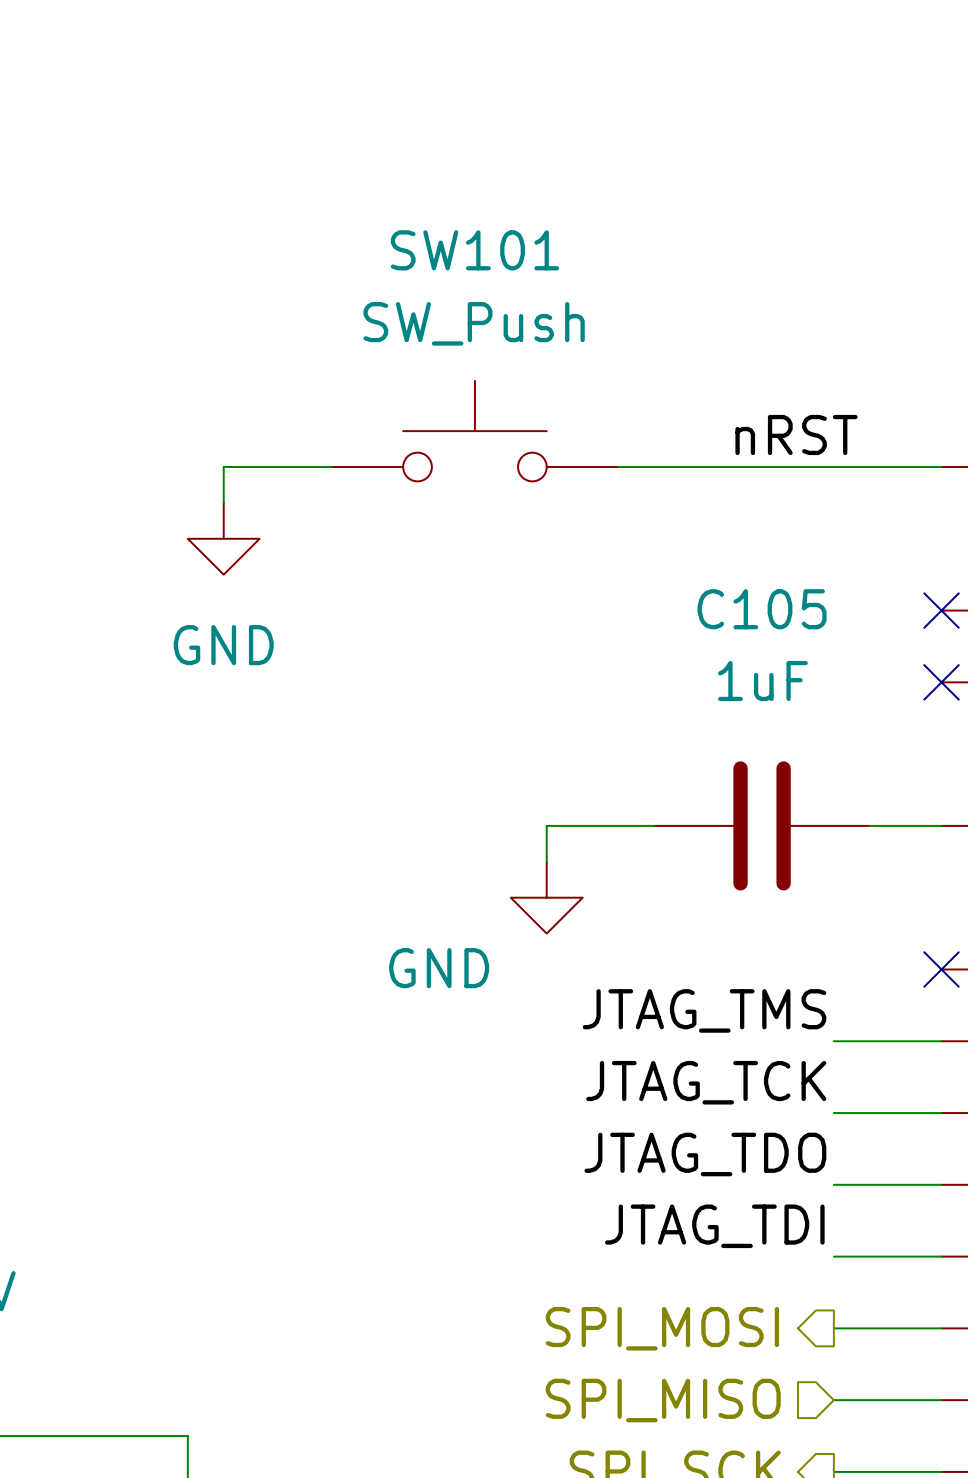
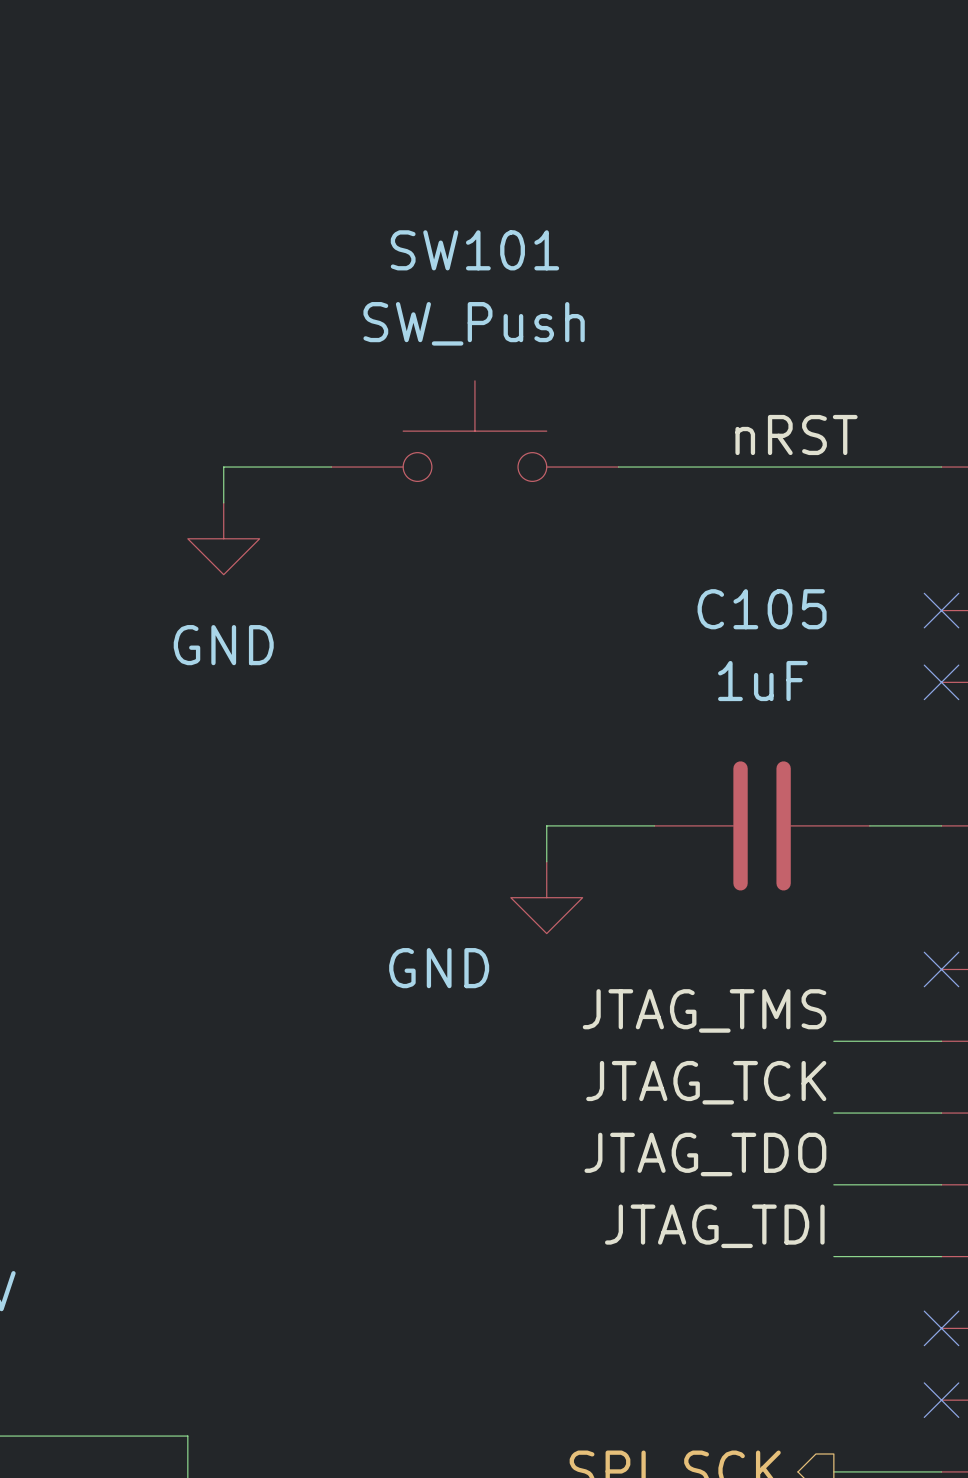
hierarchical label: SPI_MOSI (662, 1328) -> none
wire: (833, 1328) (941, 1328) -> none
no-connect mark: none -> (941, 1328)
hierarchical label: SPI_MISO (663, 1400) -> none
wire: (833, 1400) (941, 1400) -> none
no-connect mark: none -> (941, 1400)

